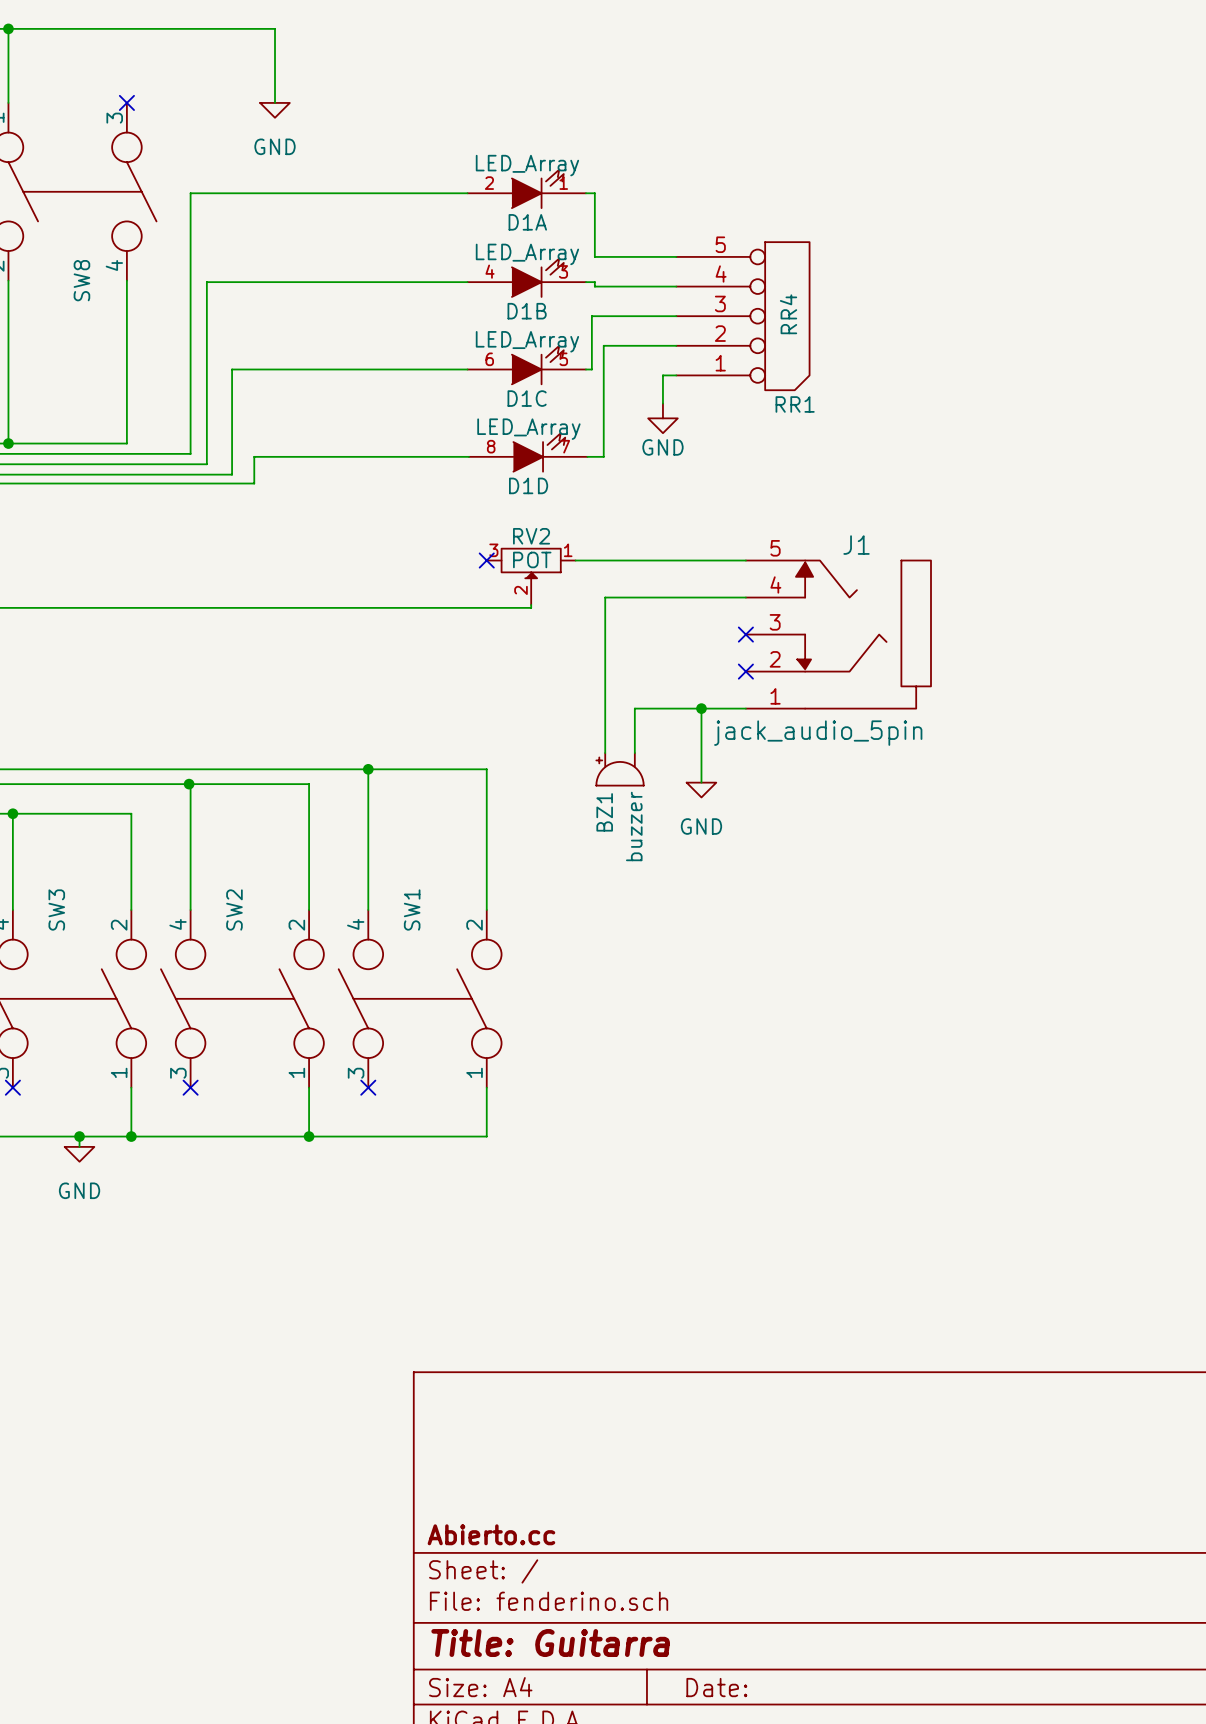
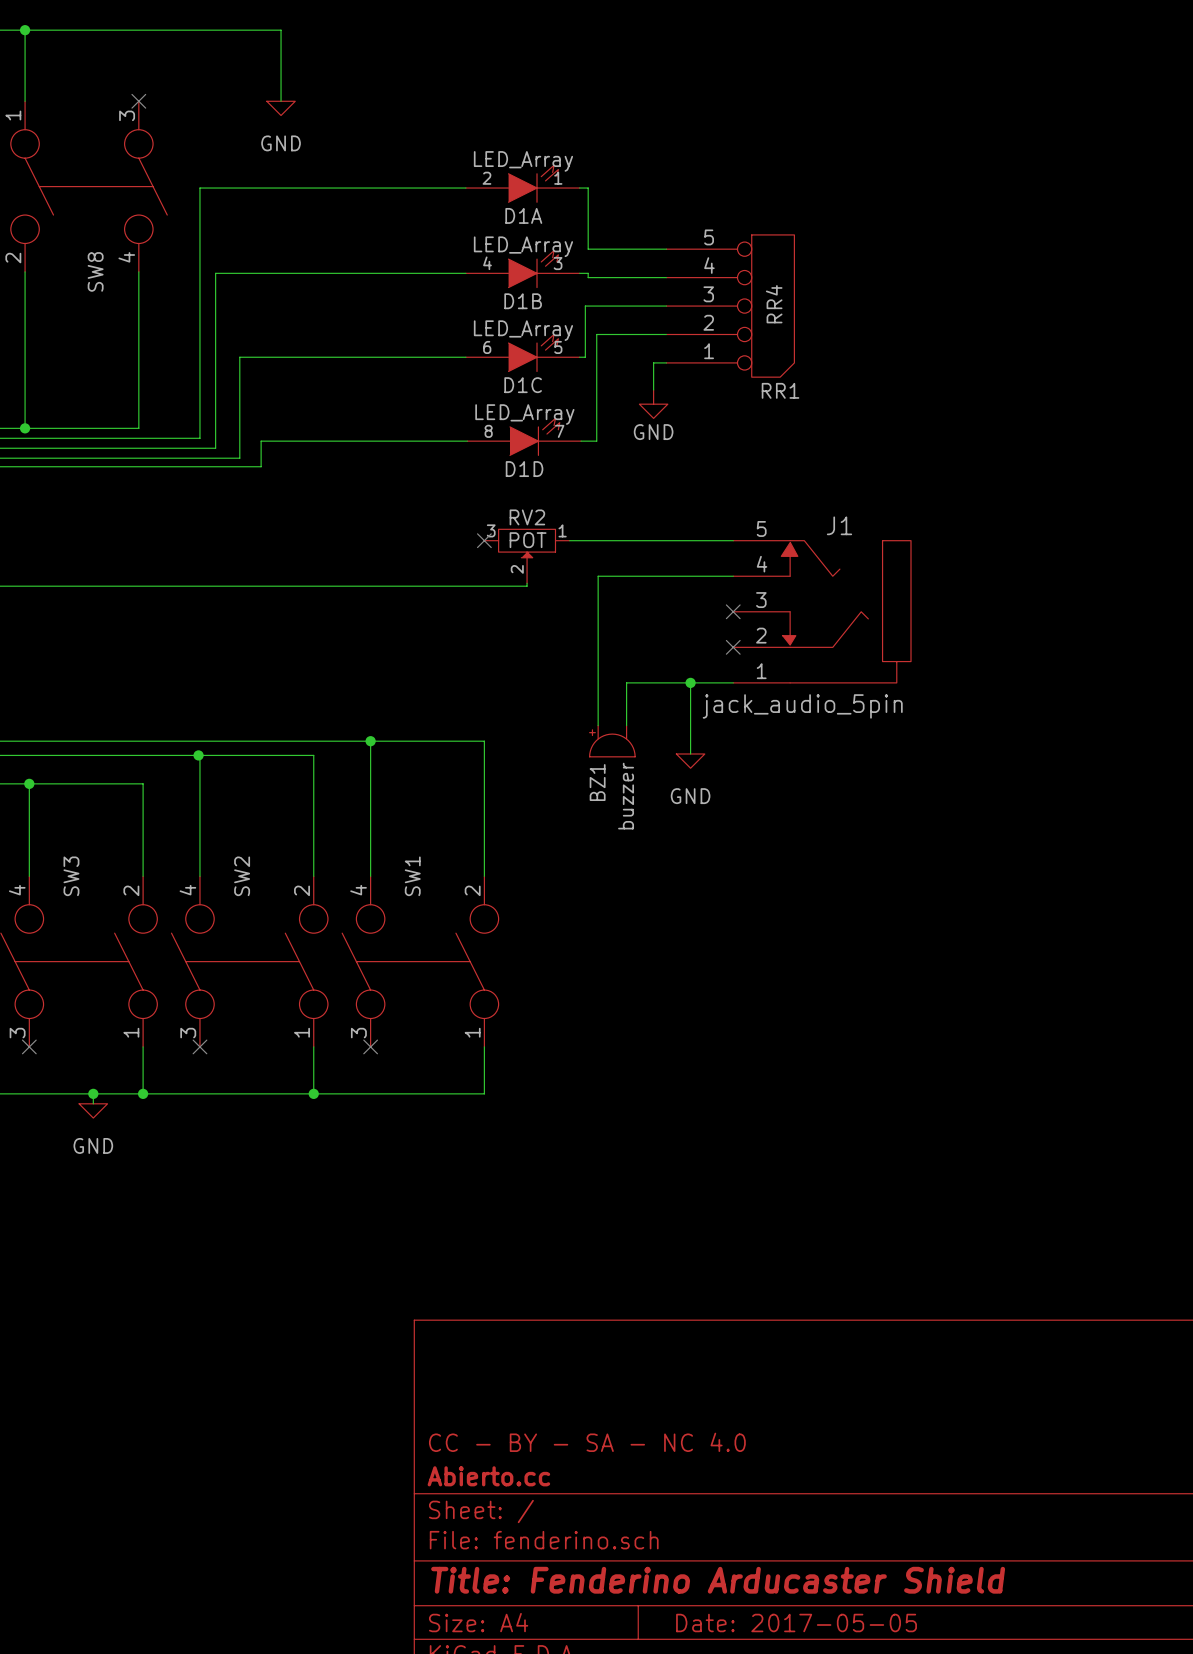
title block: none -> CC - BY - SA - NC 4.0 (587, 1442)
title block: Title: Guitarra (550, 1643) -> Title: Fenderino Arducaster Shield (718, 1580)
title block: Date: (716, 1687) -> Date: 2017-05-05 (796, 1623)

